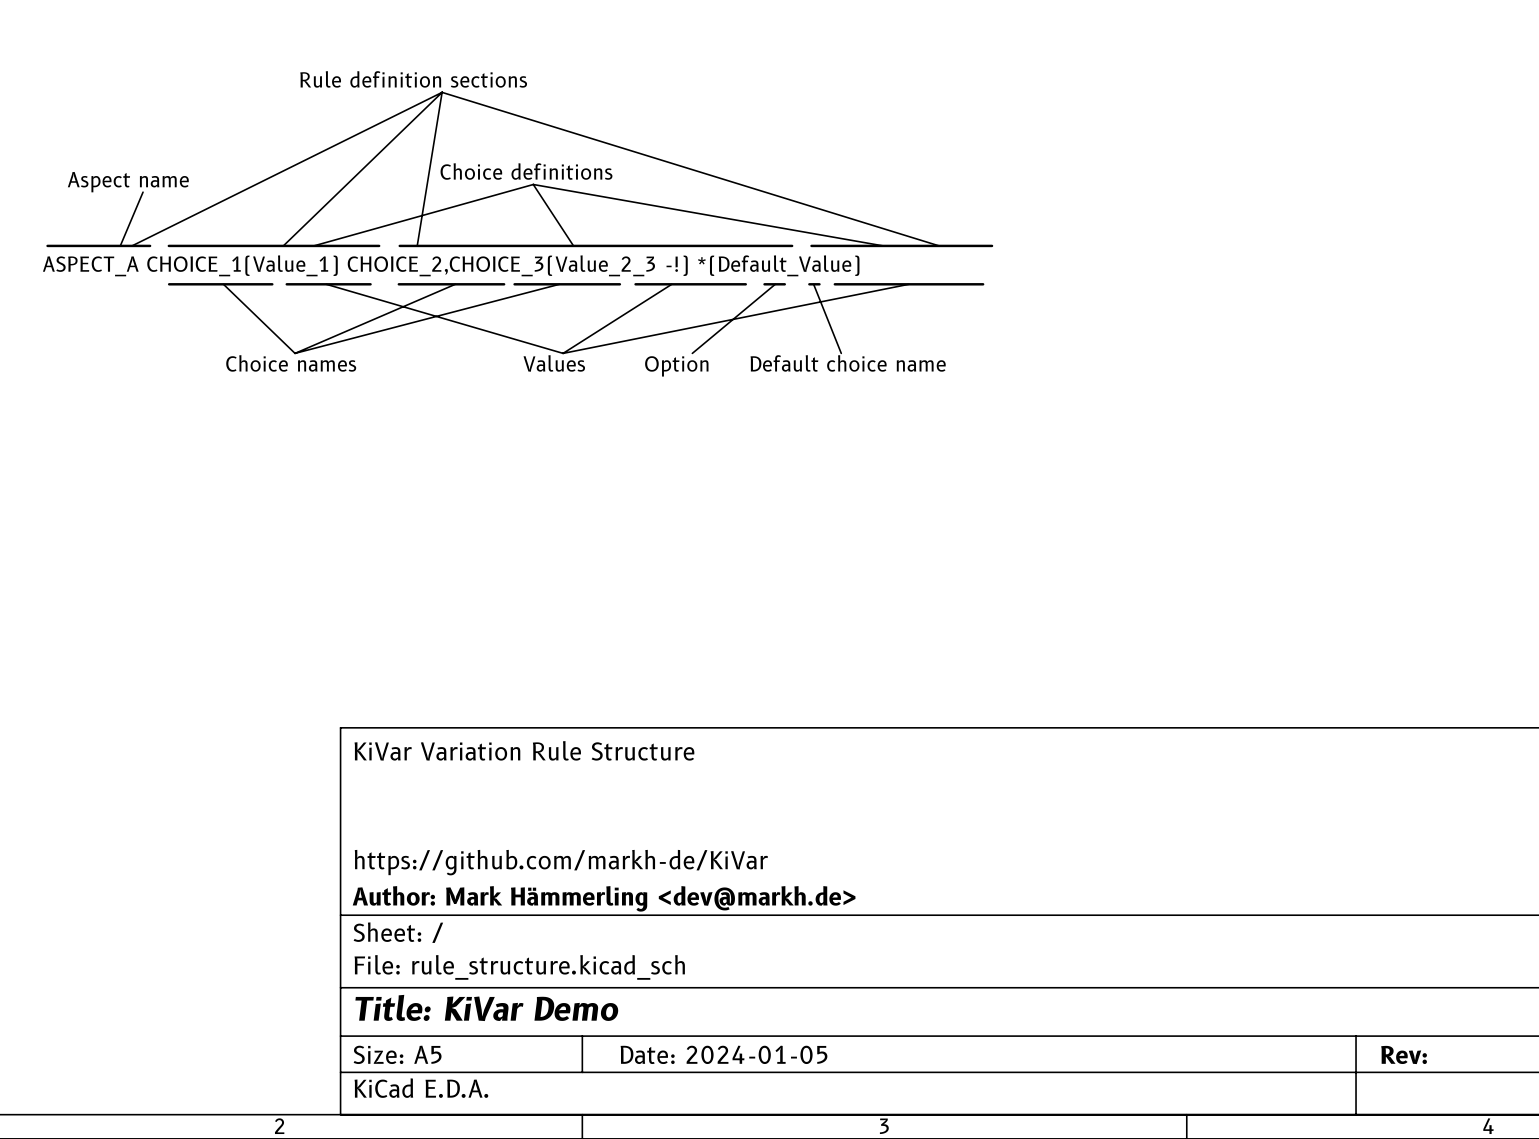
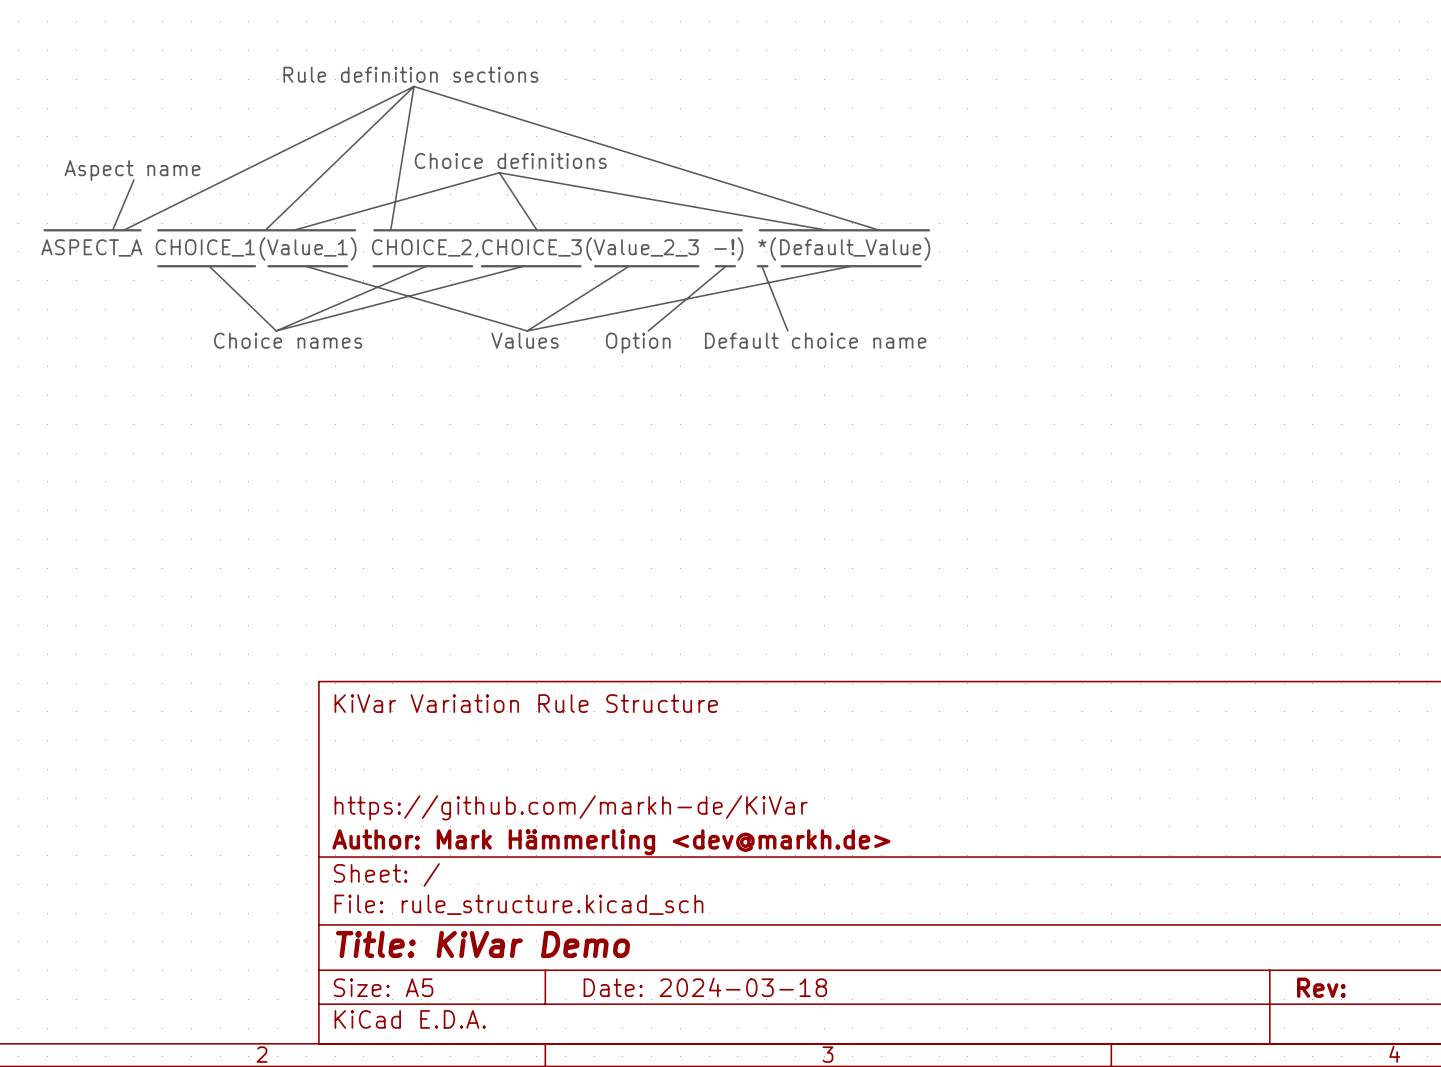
title block: Date: 2024-01-05 (724, 1054) -> Date: 2024-03-18 (705, 987)

